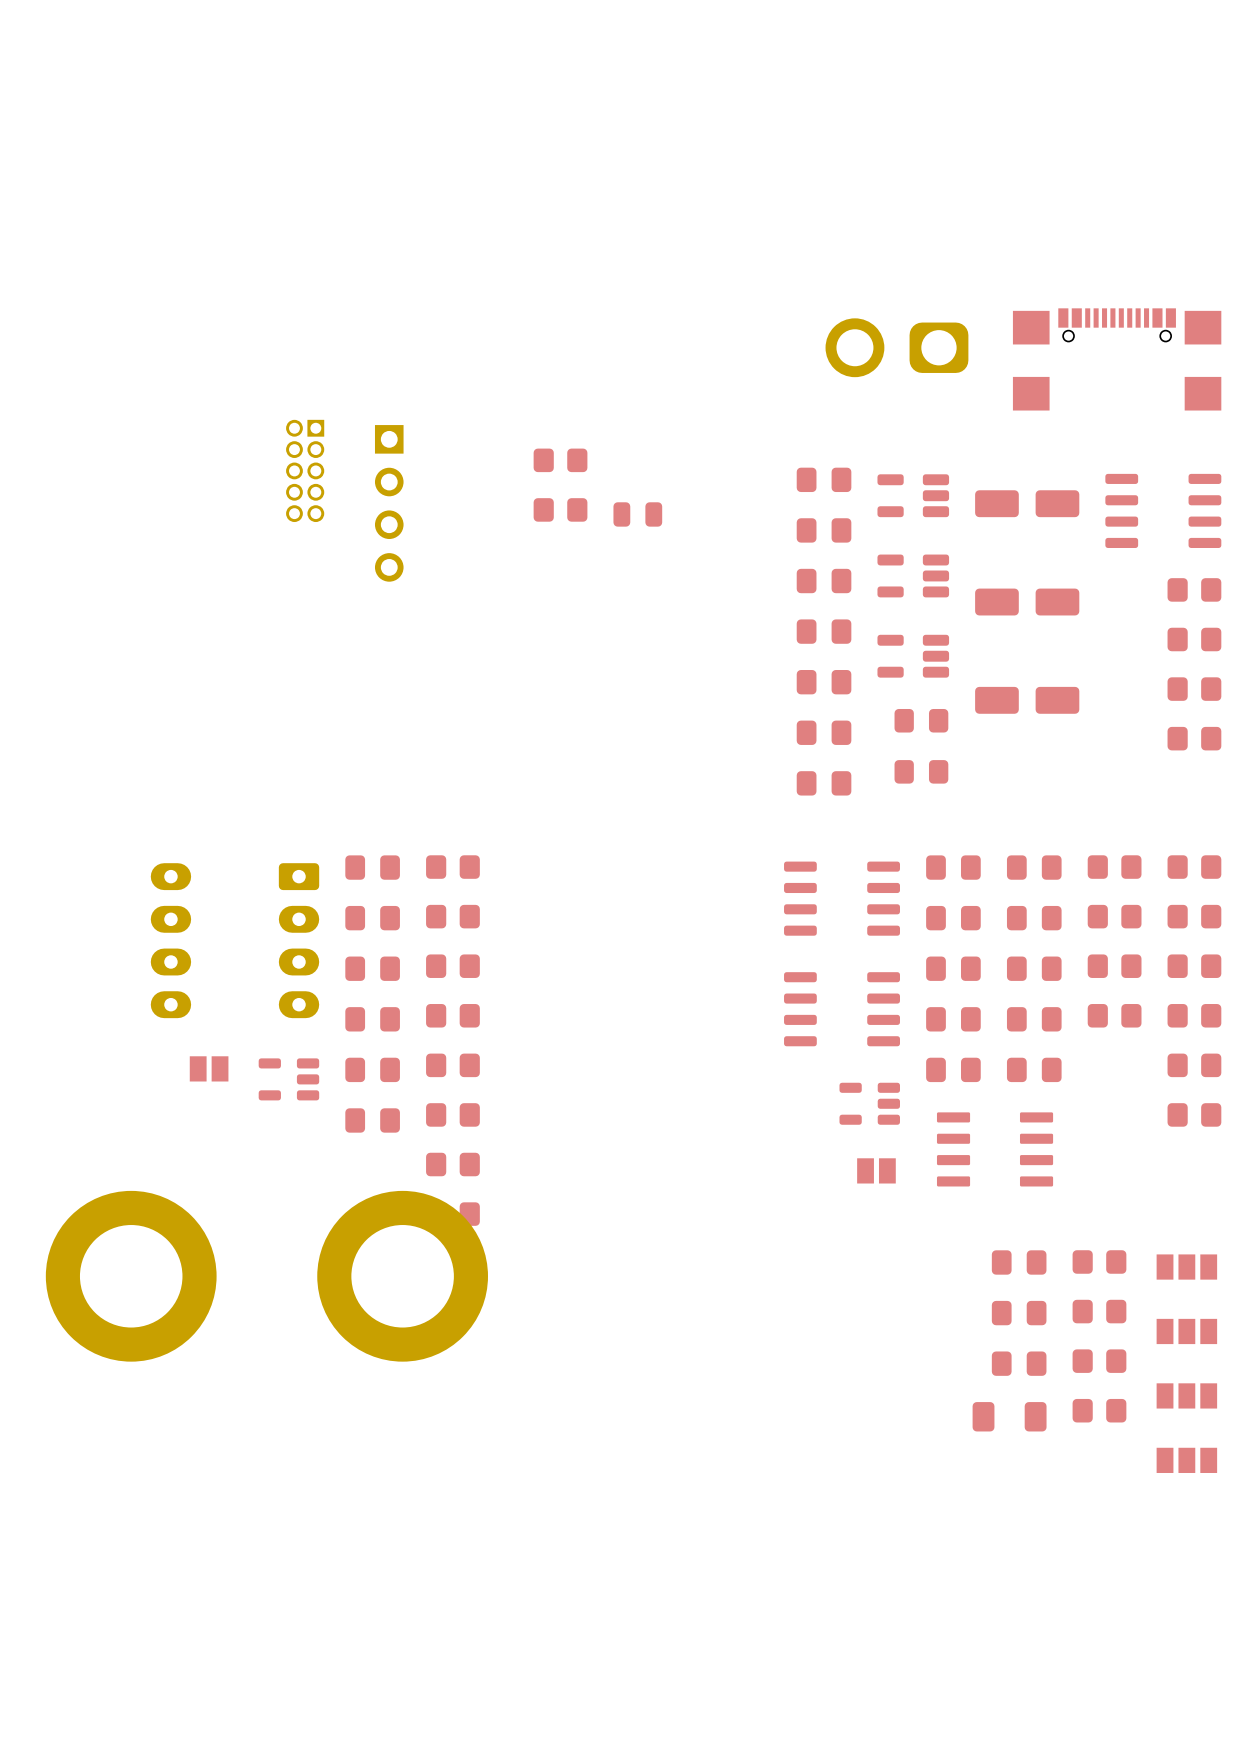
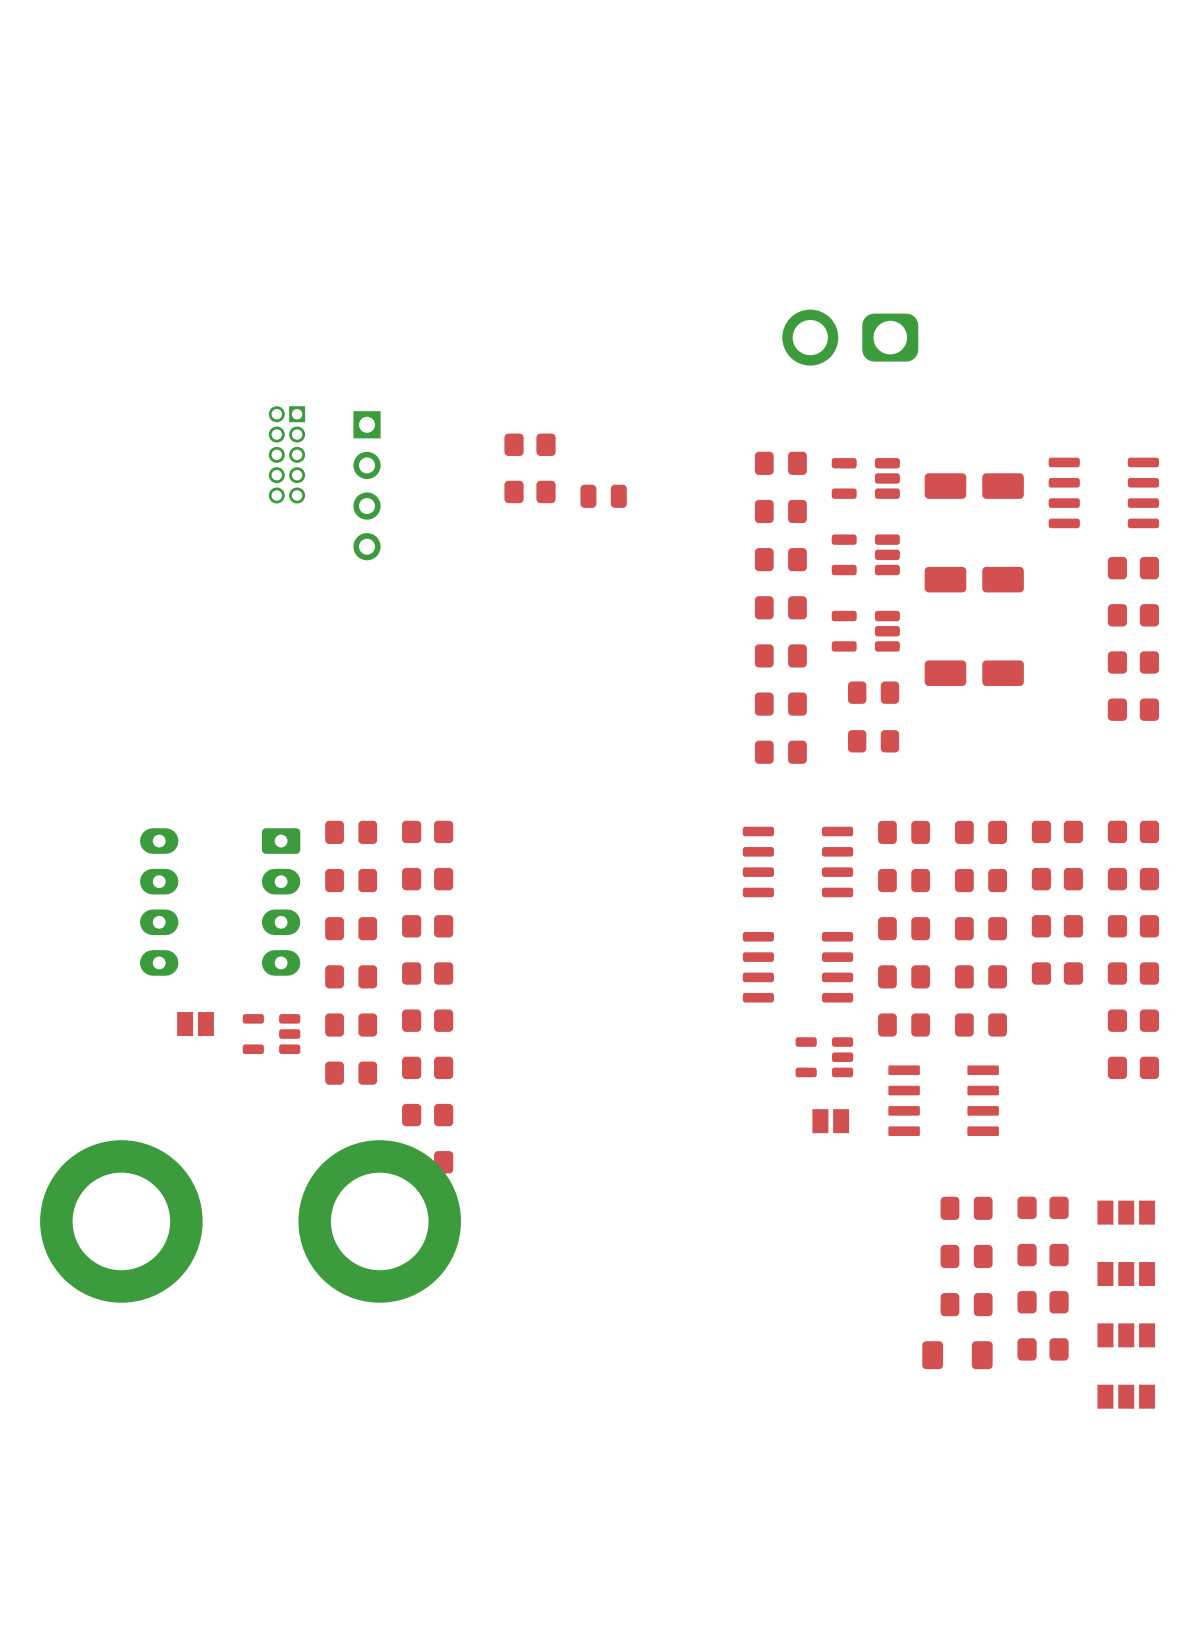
part: (1117, 359) -> none

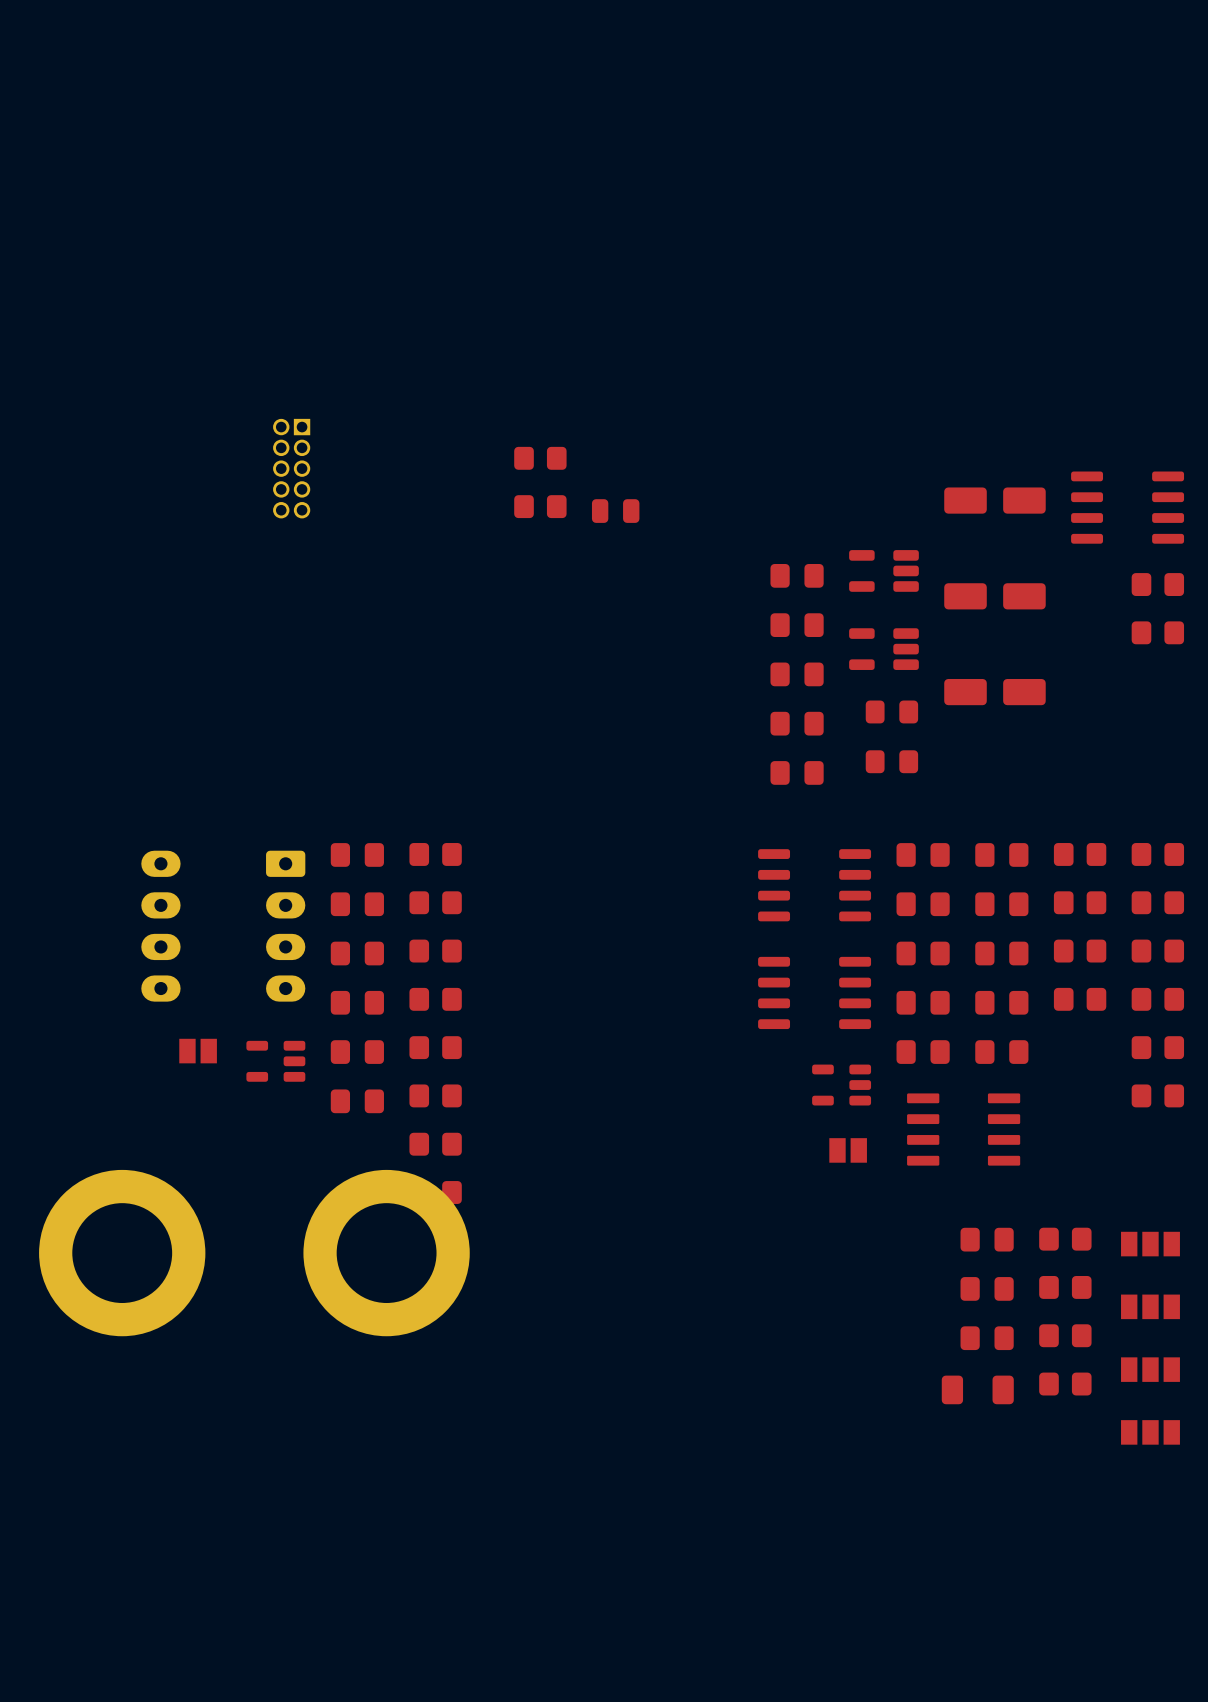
part: (850, 337) -> none
part: (780, 463) -> none
part: (865, 478) -> none
part: (367, 485) -> none
part: (780, 511) -> none
part: (1133, 662) -> none
part: (1133, 709) -> none

